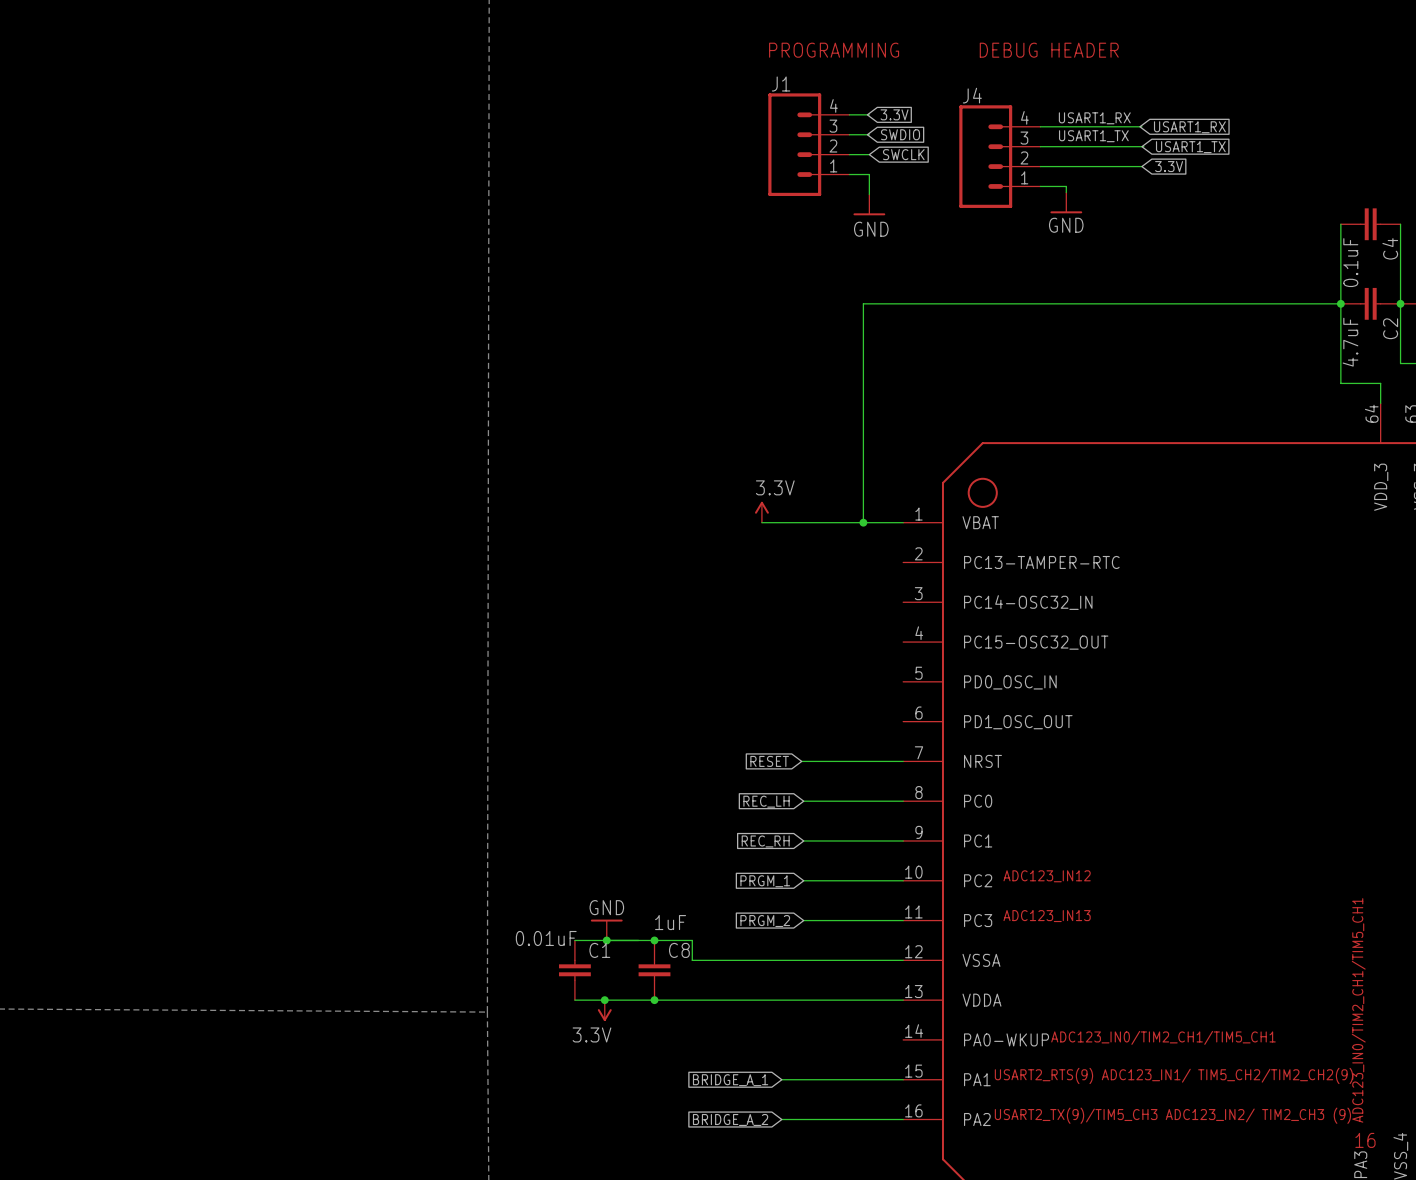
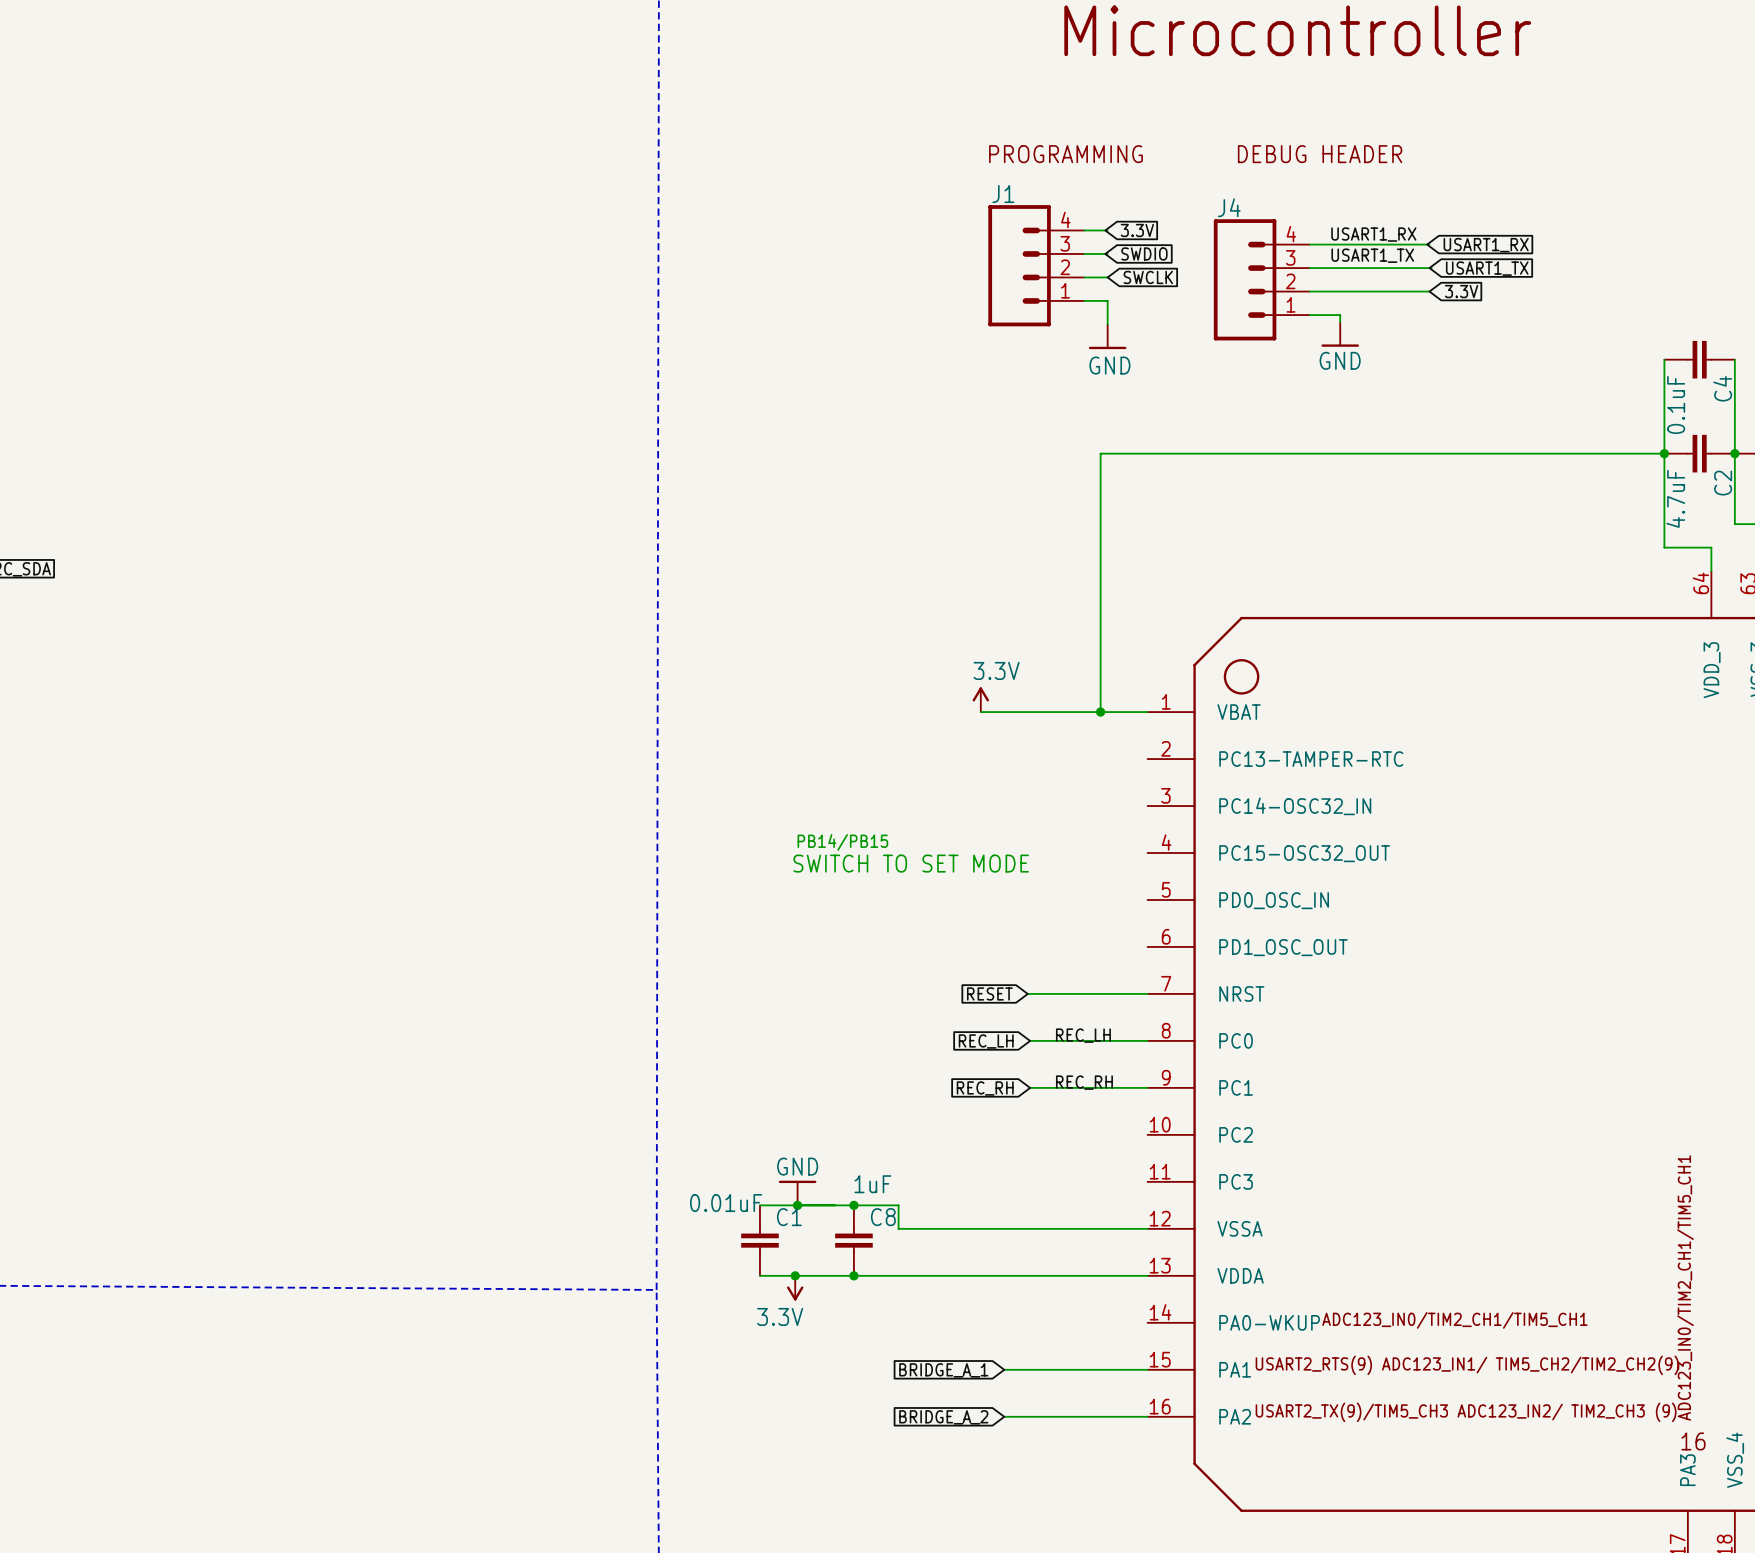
text: none -> PB14/PB15 (842, 842)
text: none -> SWITCH TO SET MODE (911, 863)
label: none -> REC_LH (1083, 1035)
label: none -> REC_RH (1084, 1082)
text: ADC123_IN12 (1047, 876) -> none
wire: (803, 880) (903, 880) -> none
global label: PRGM_1 (765, 881) -> none
text: ADC123_IN13 (1047, 916) -> none
wire: (803, 920) (903, 920) -> none
global label: PRGM_2 (765, 921) -> none

